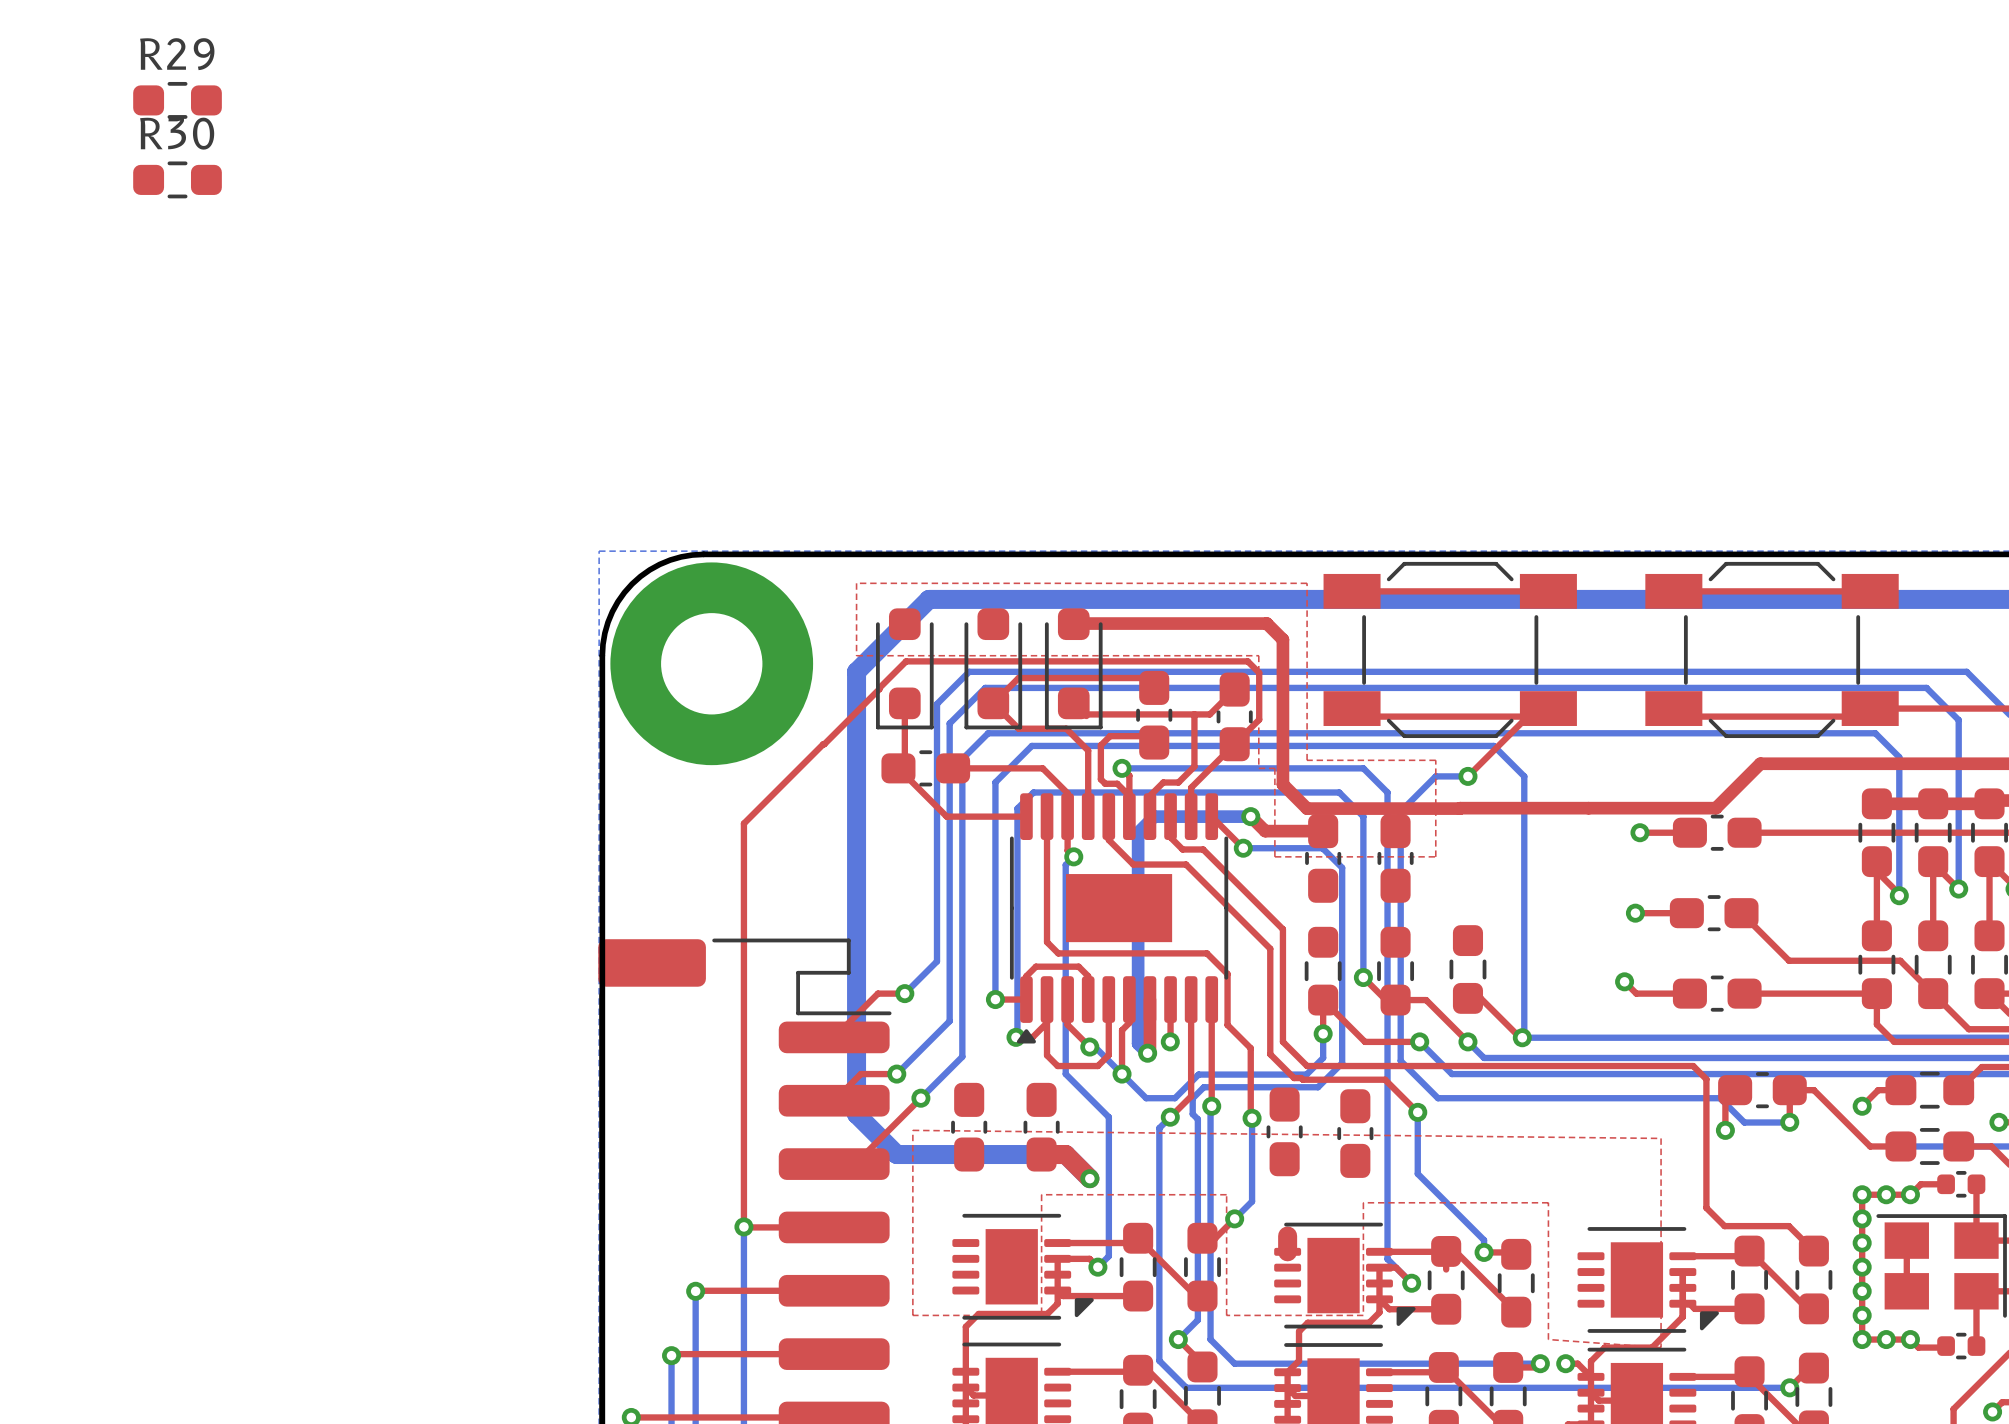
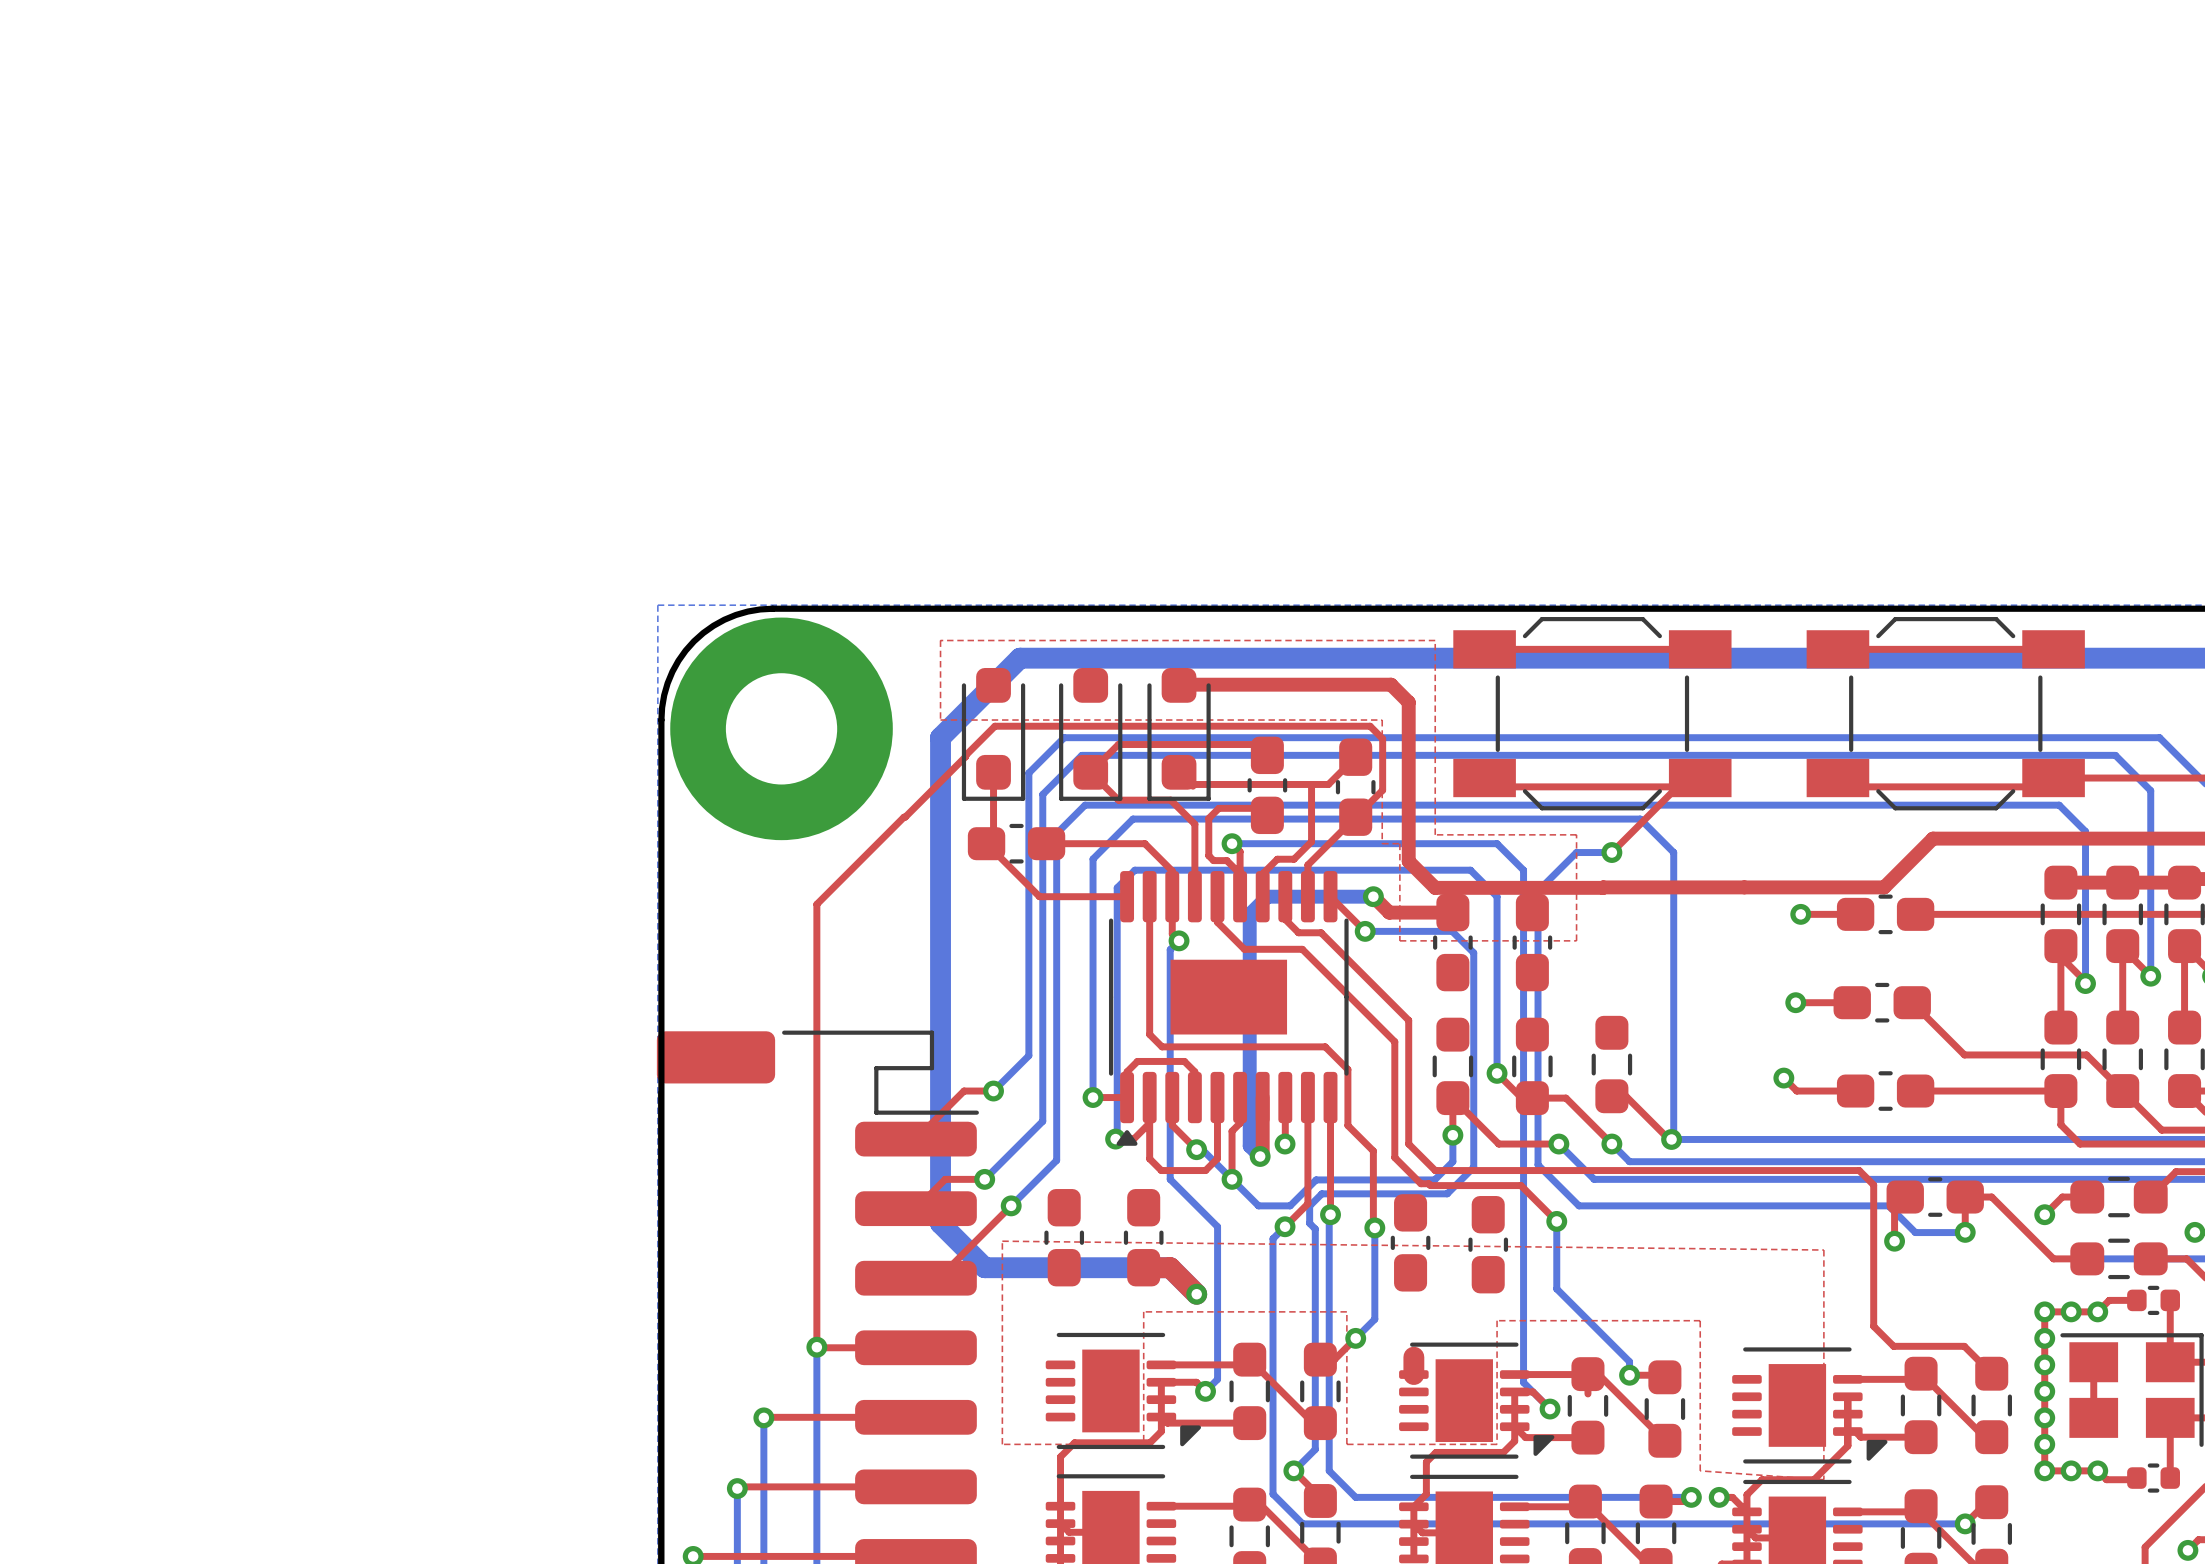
R29: (177, 100) -> none
R30: (177, 179) -> none

